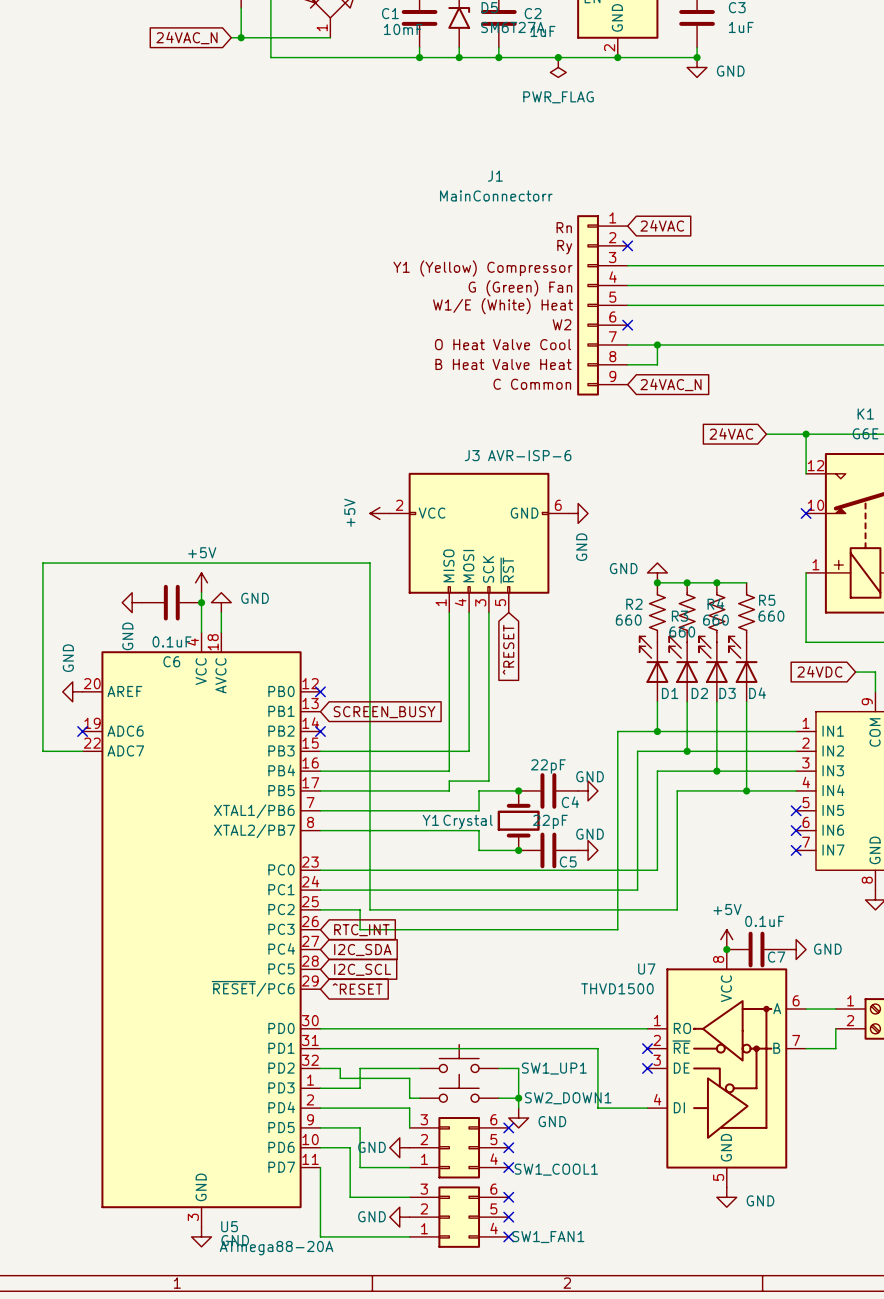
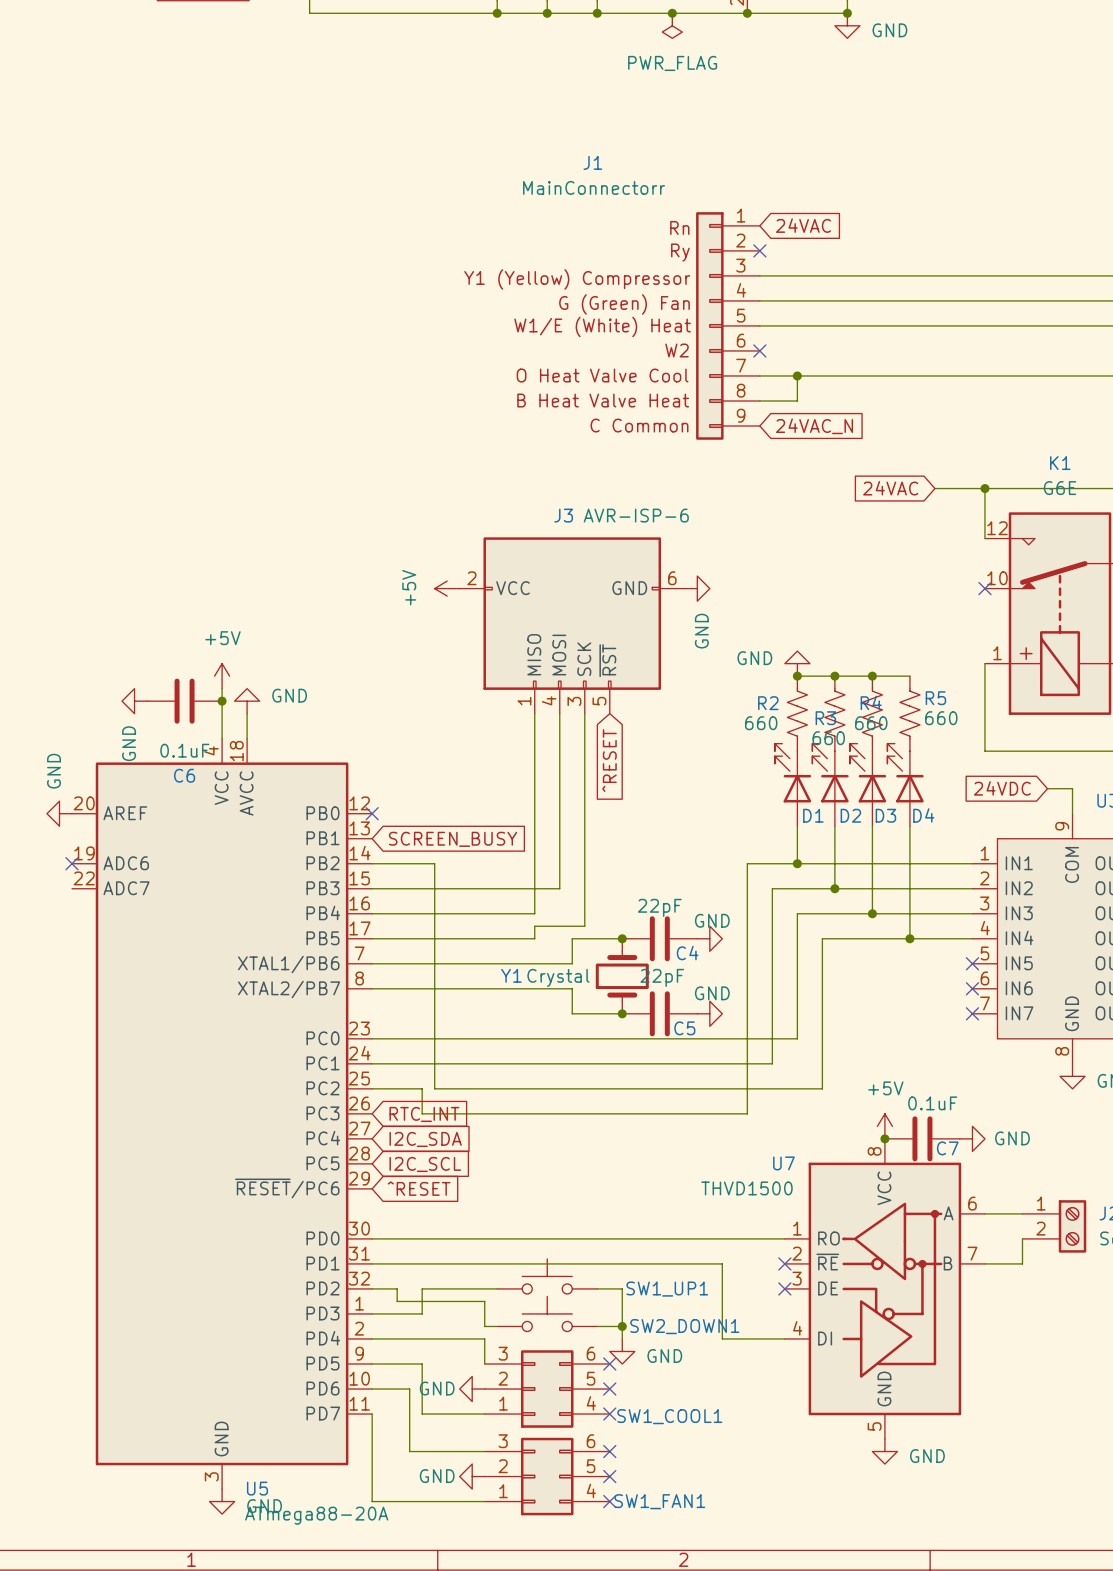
no-connect mark: (320, 731) -> none
wire: (370, 731) (370, 563) (42, 563) (42, 751) (82, 751) -> (434, 863) (372, 863)

